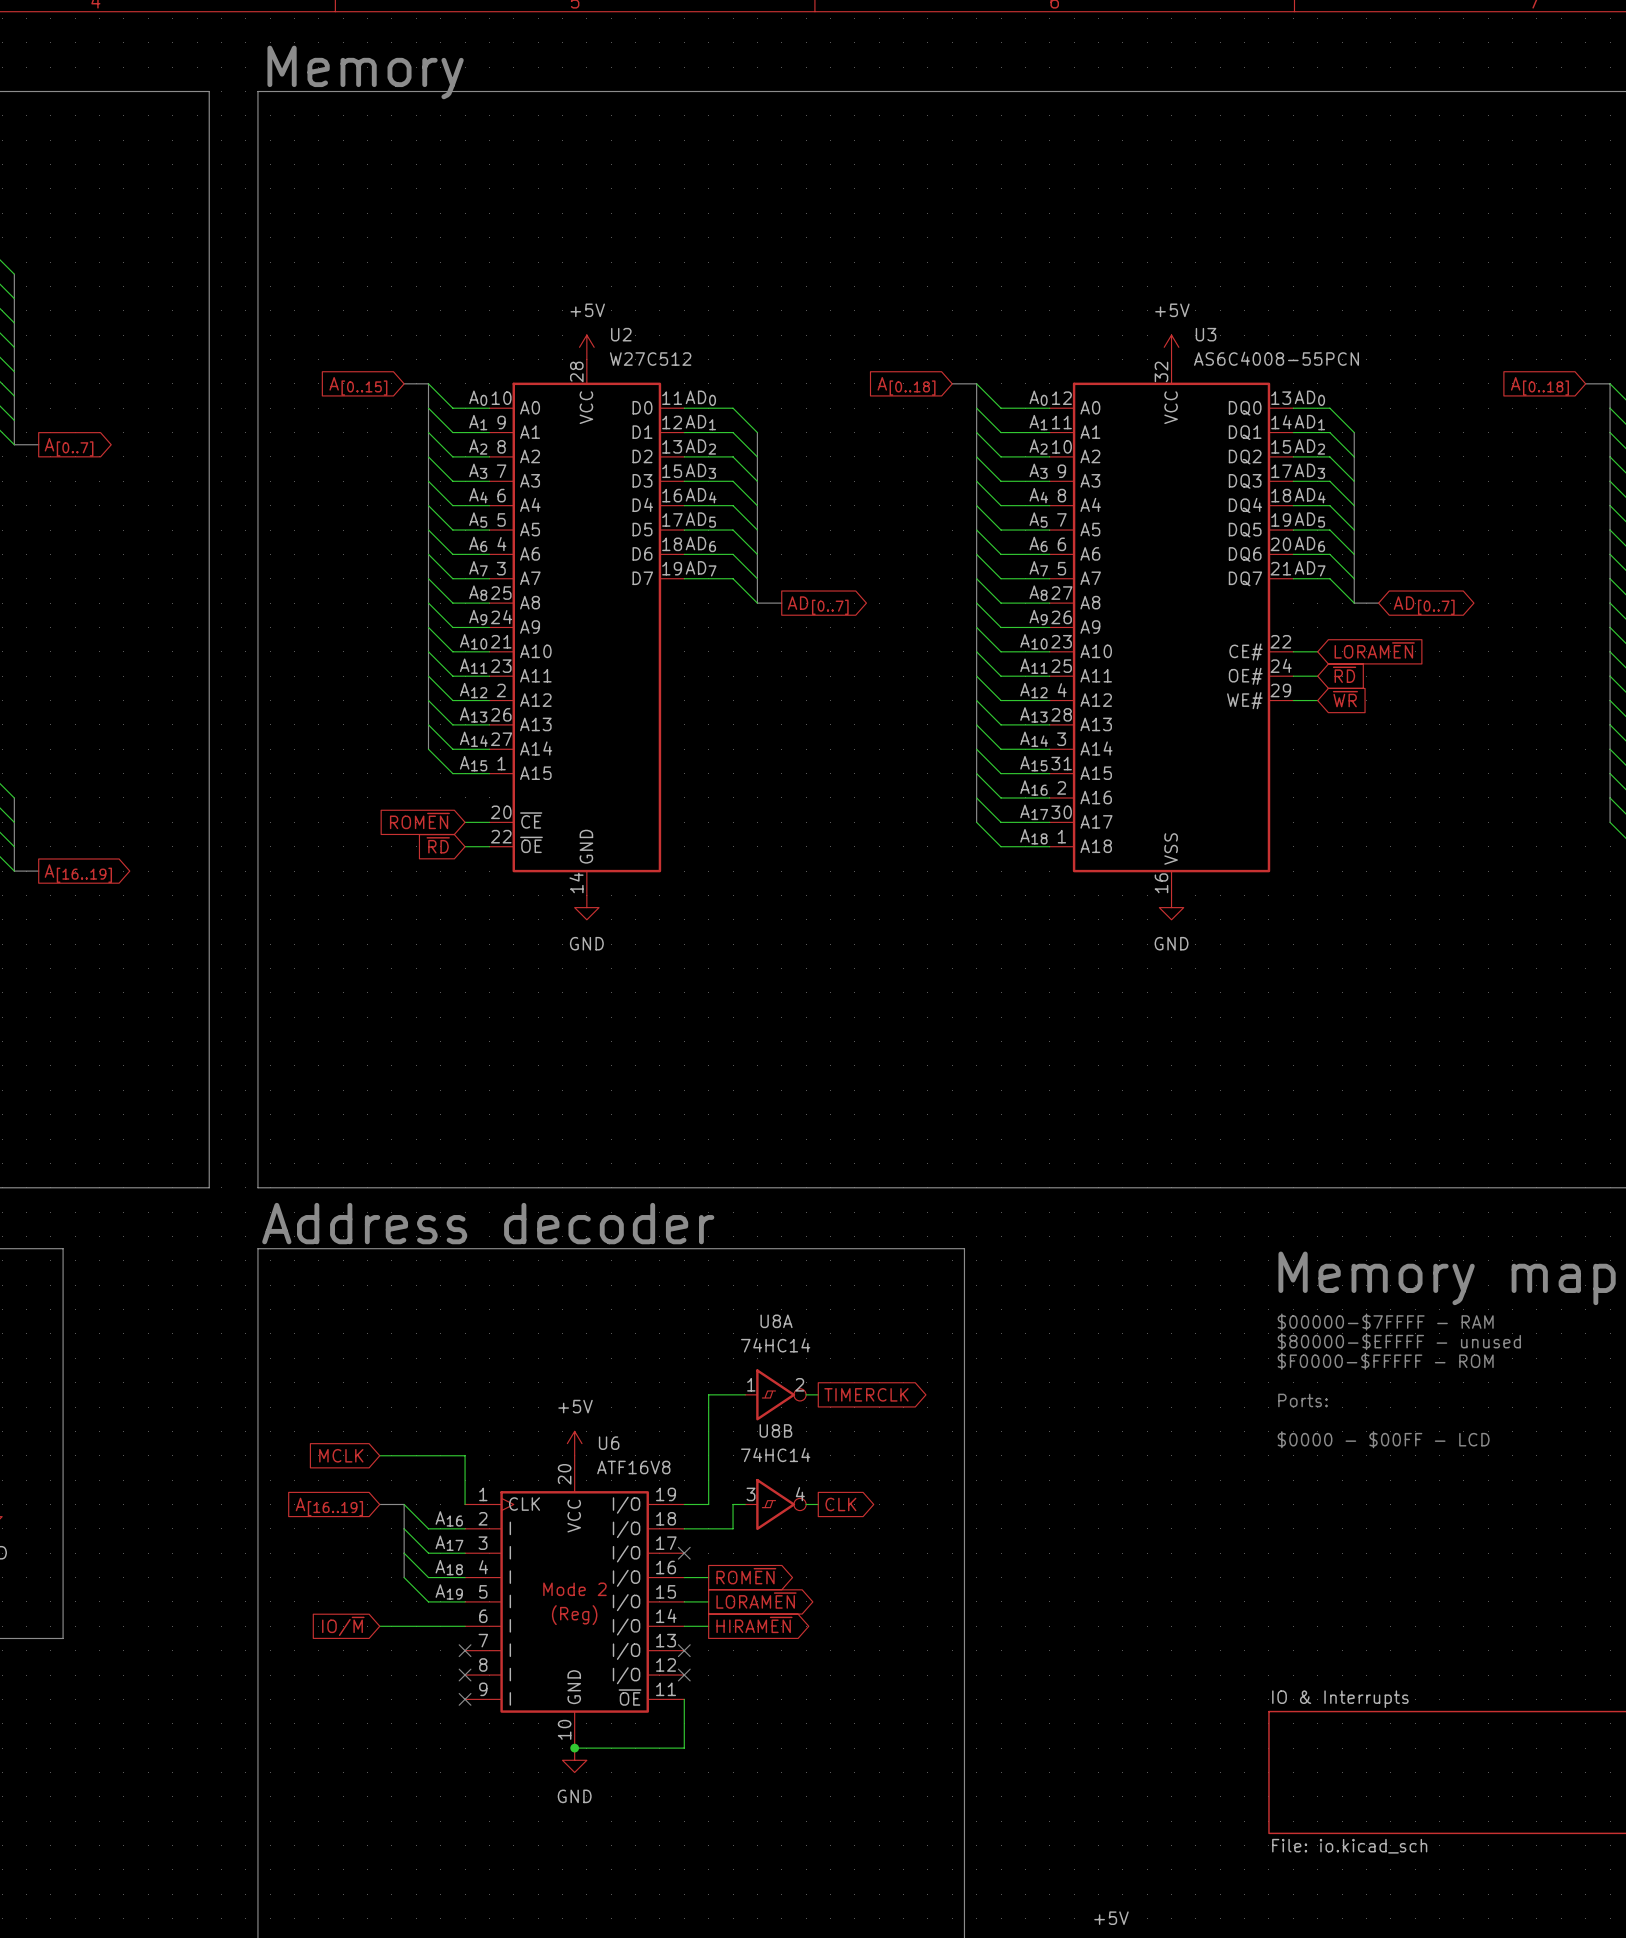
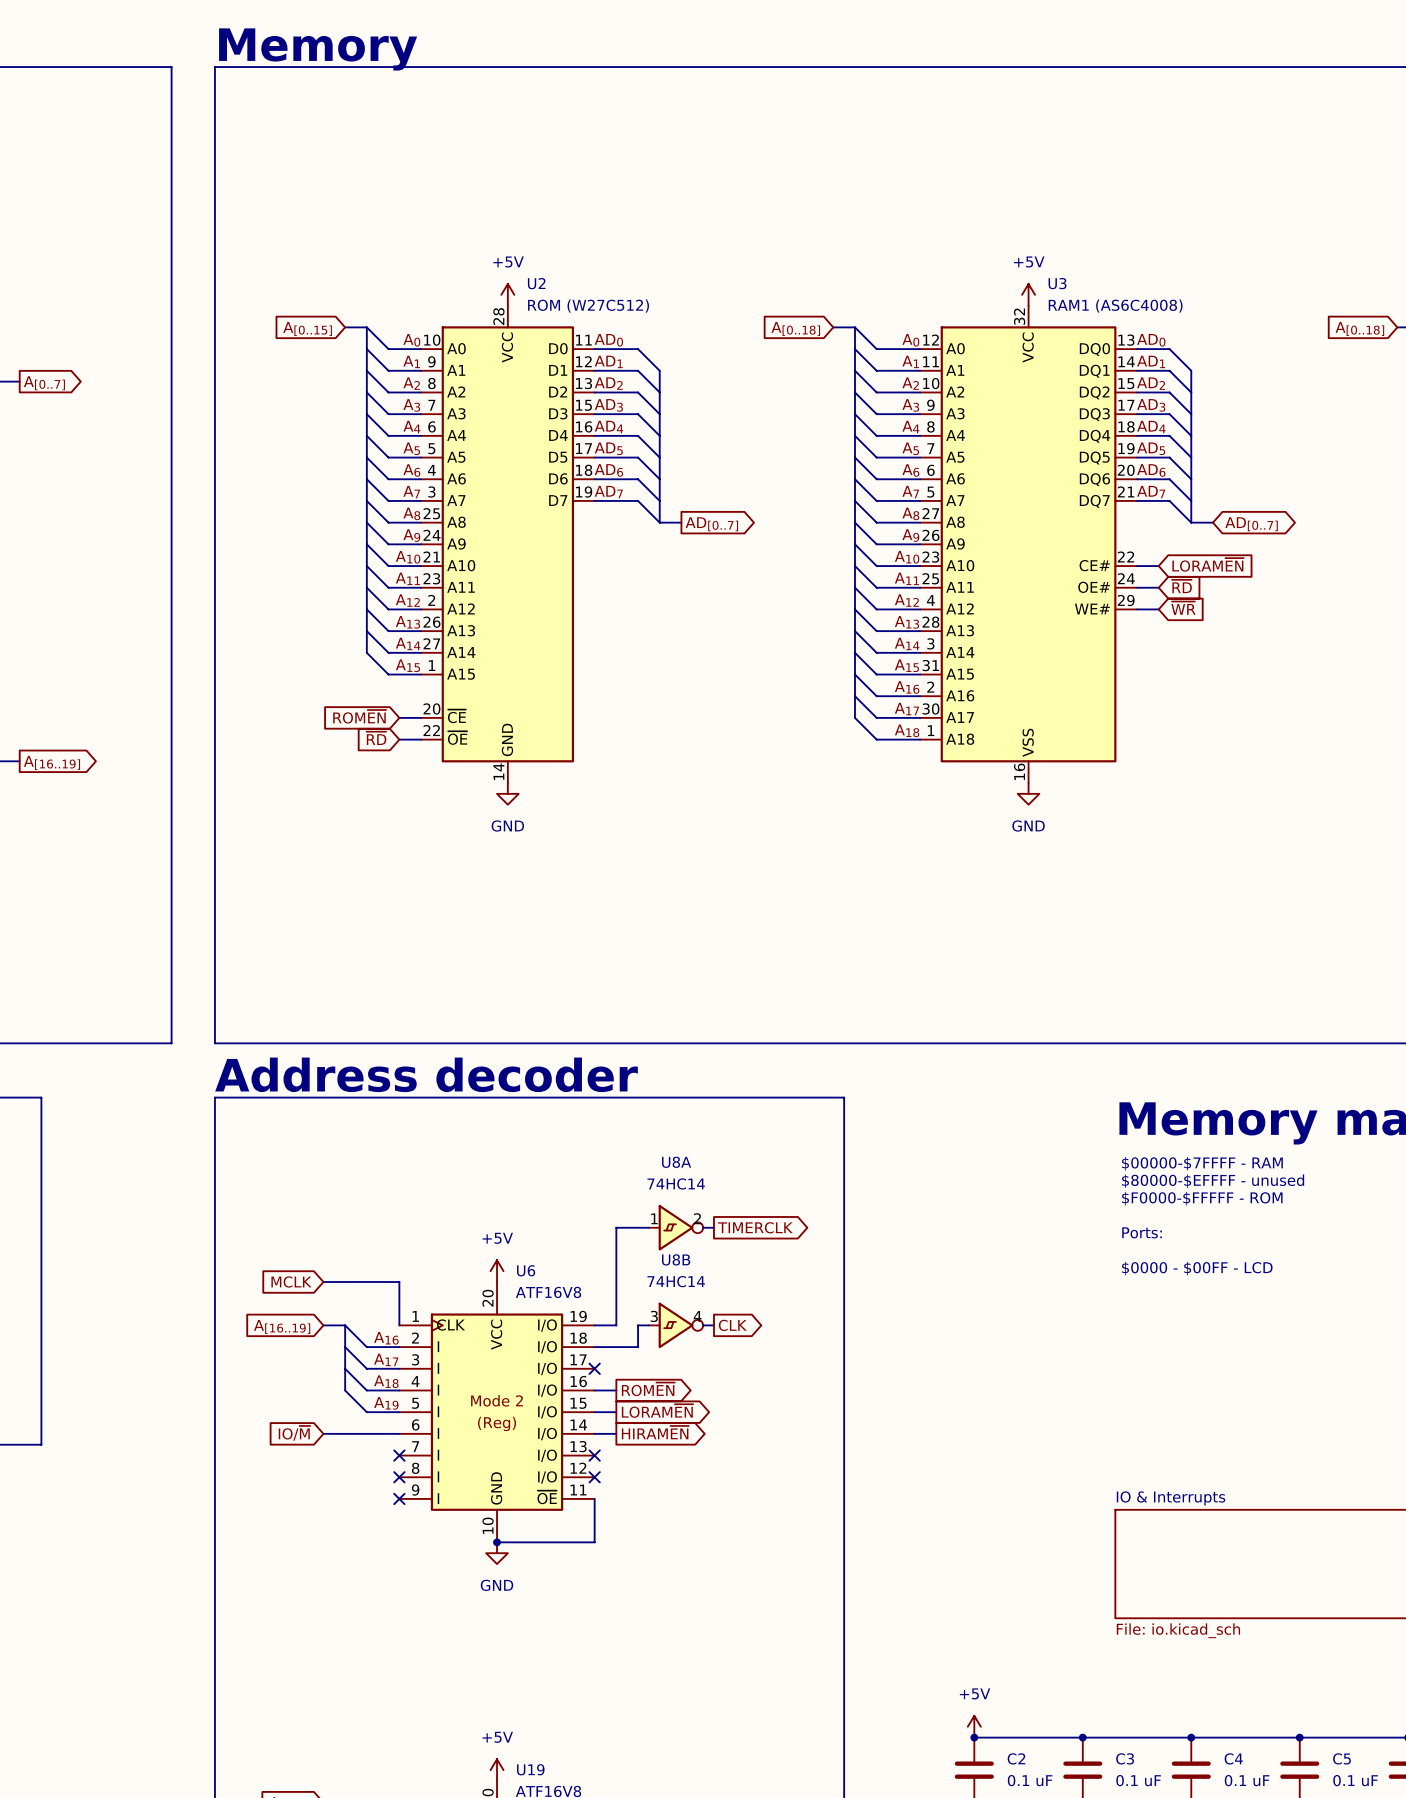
U3 value: AS6C4008-55PCN (1276, 358) -> RAM1 (AS6C4008) (1115, 306)
U2 value: W27C512 (650, 359) -> ROM (W27C512) (588, 306)

